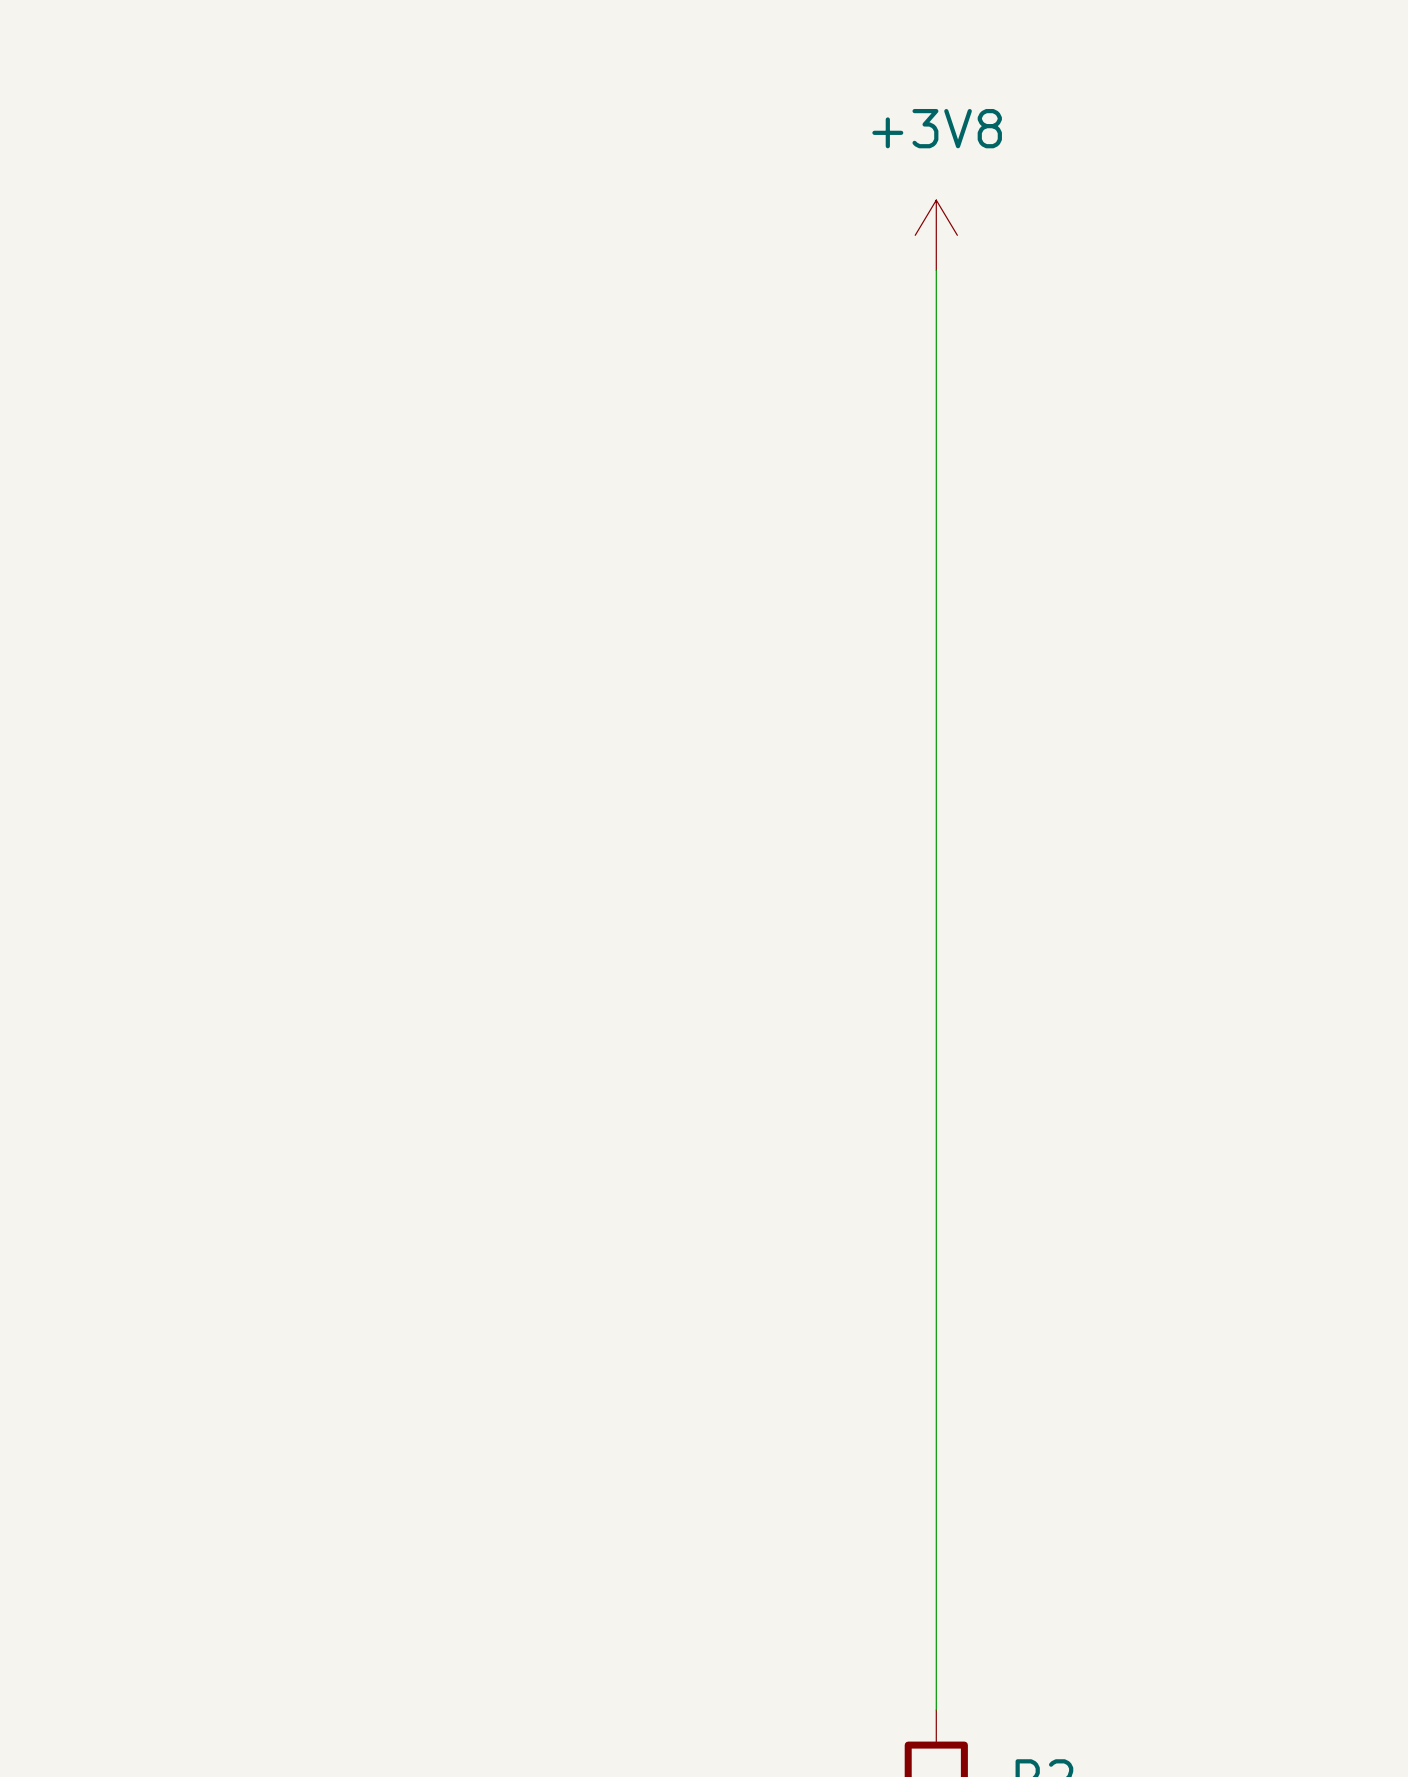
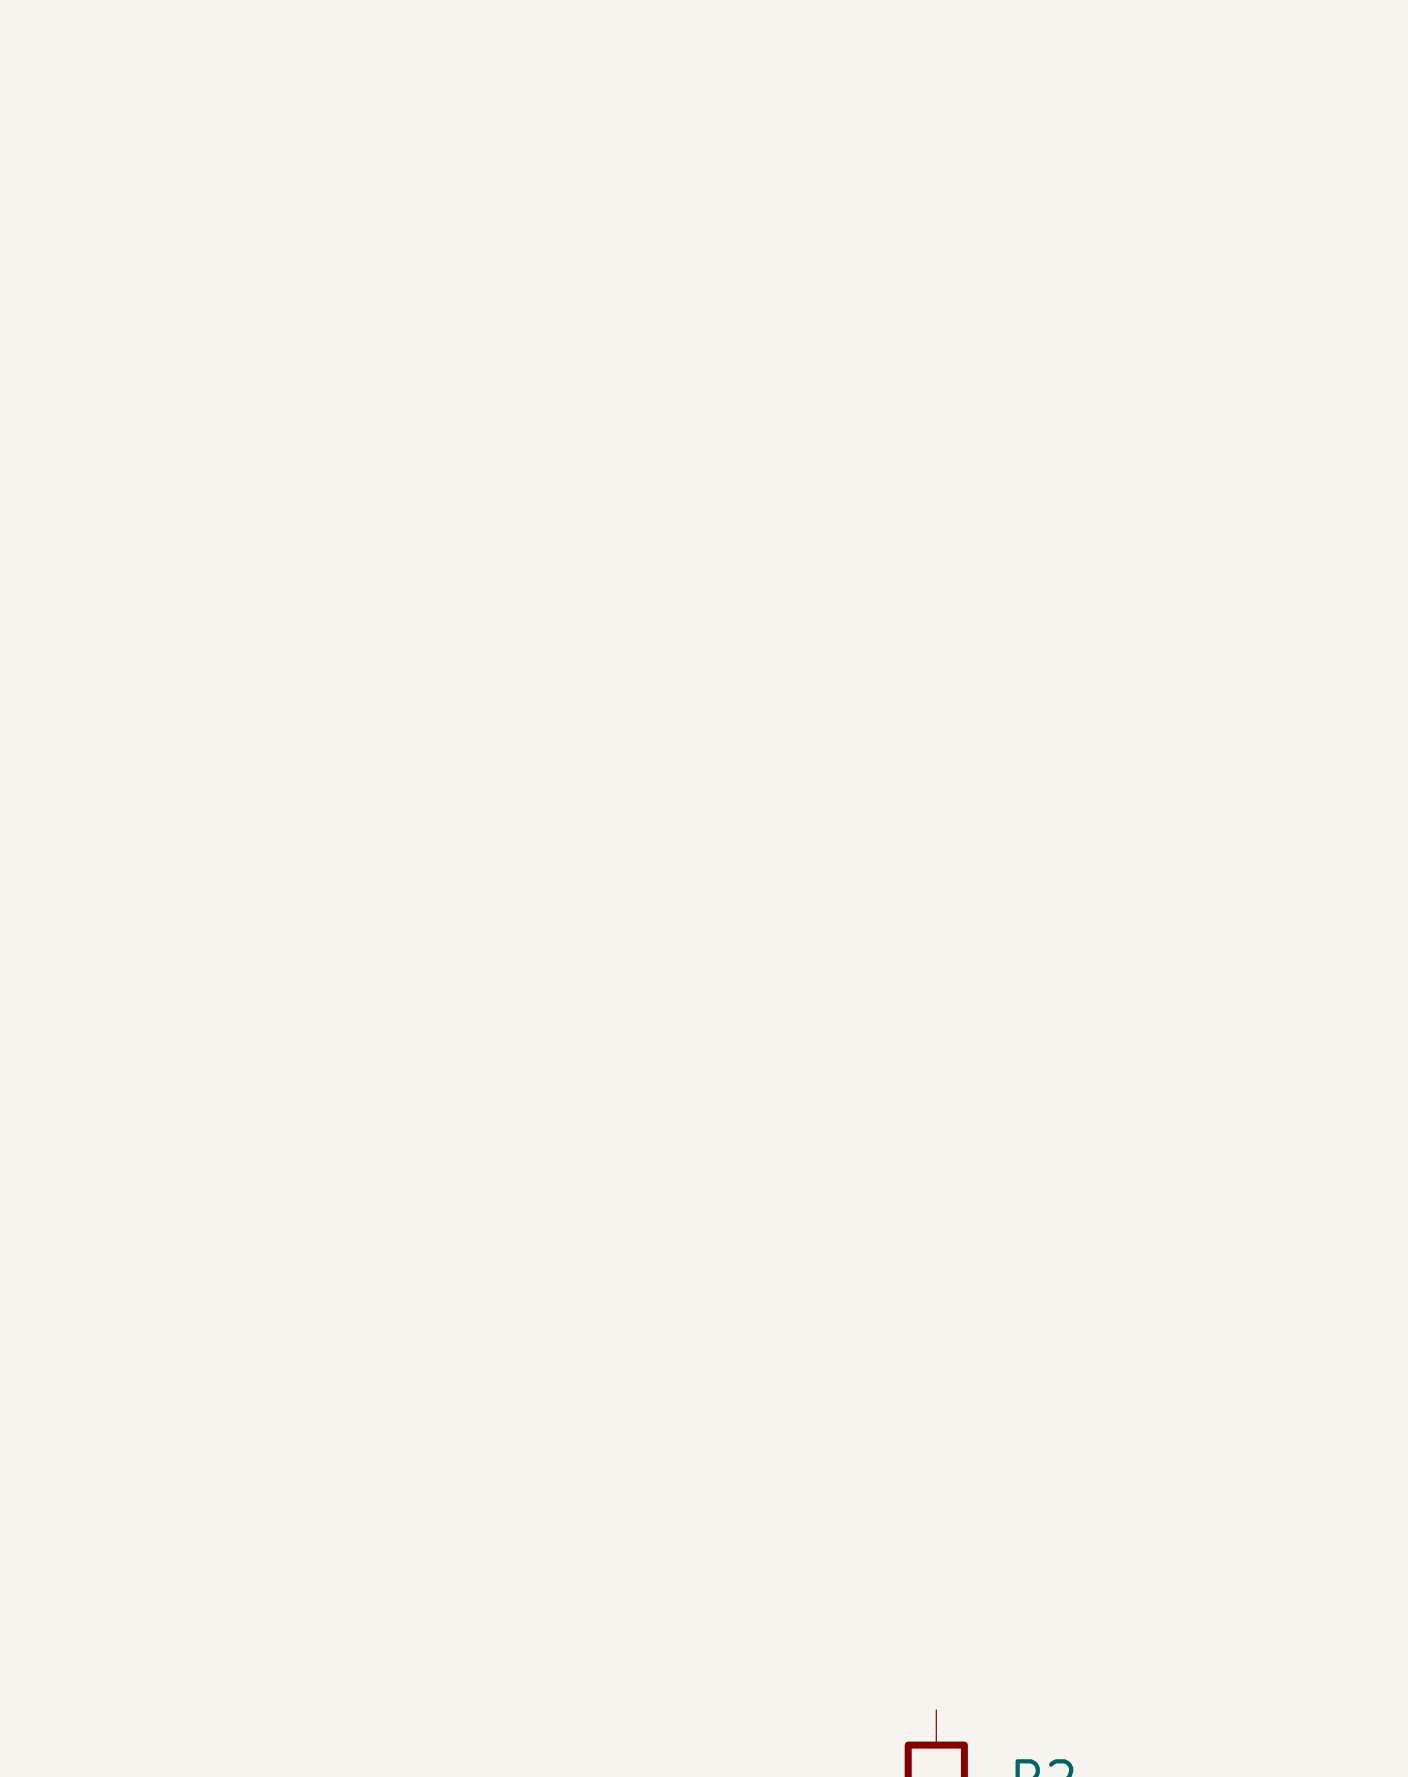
power symbol: +3V8 (936, 235) -> none
wire: (936, 270) (936, 1709) -> none

